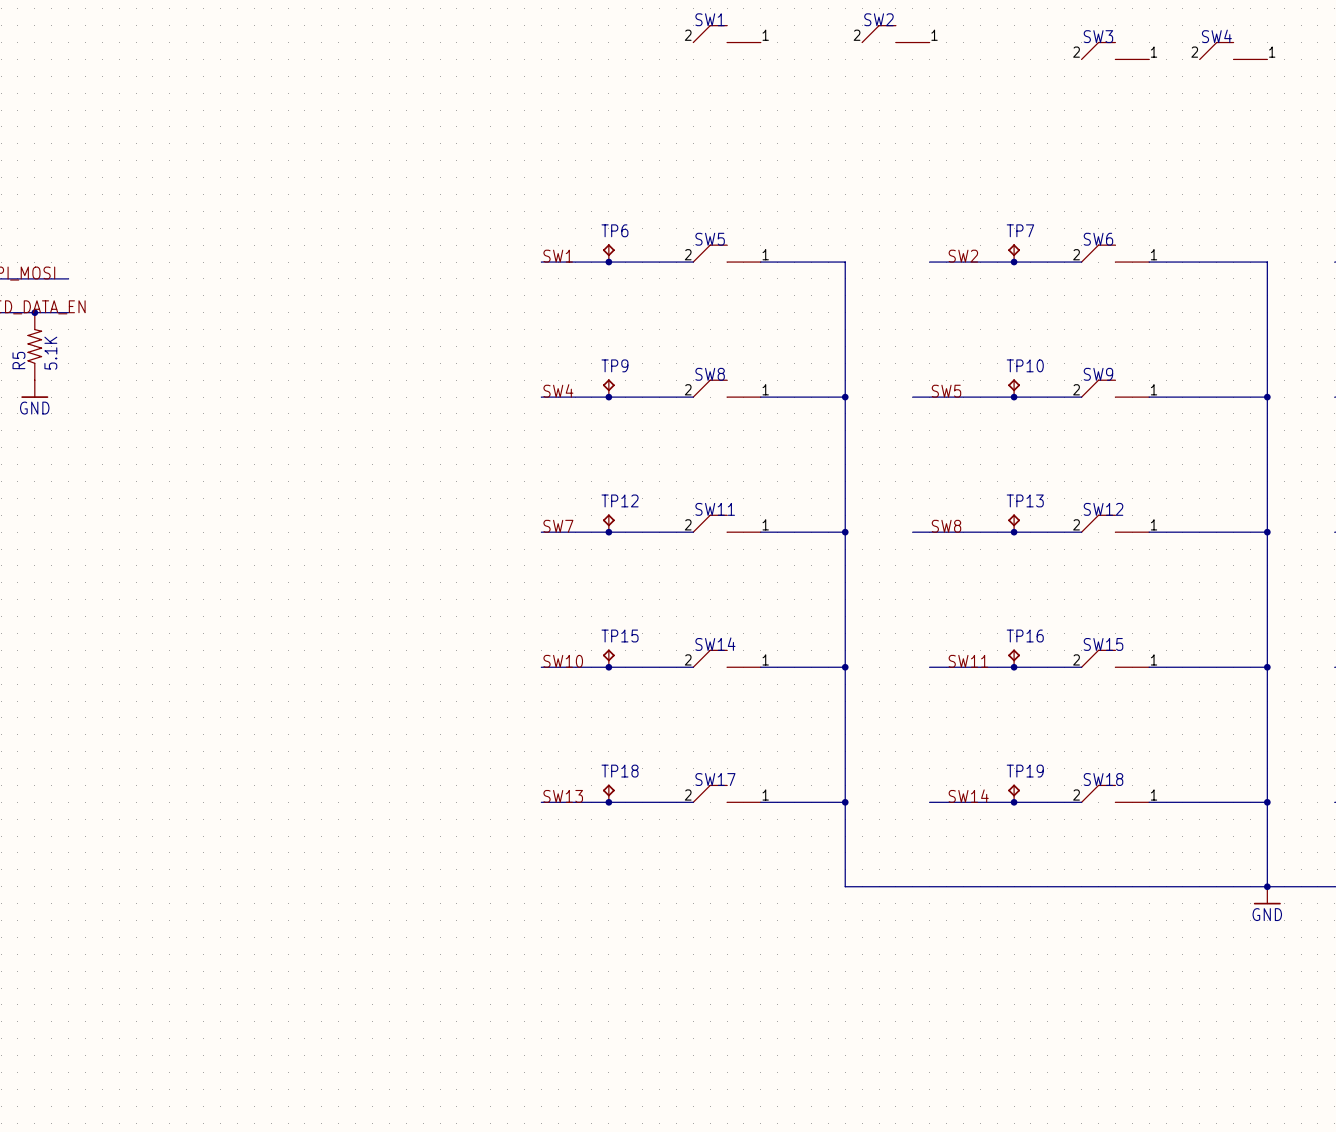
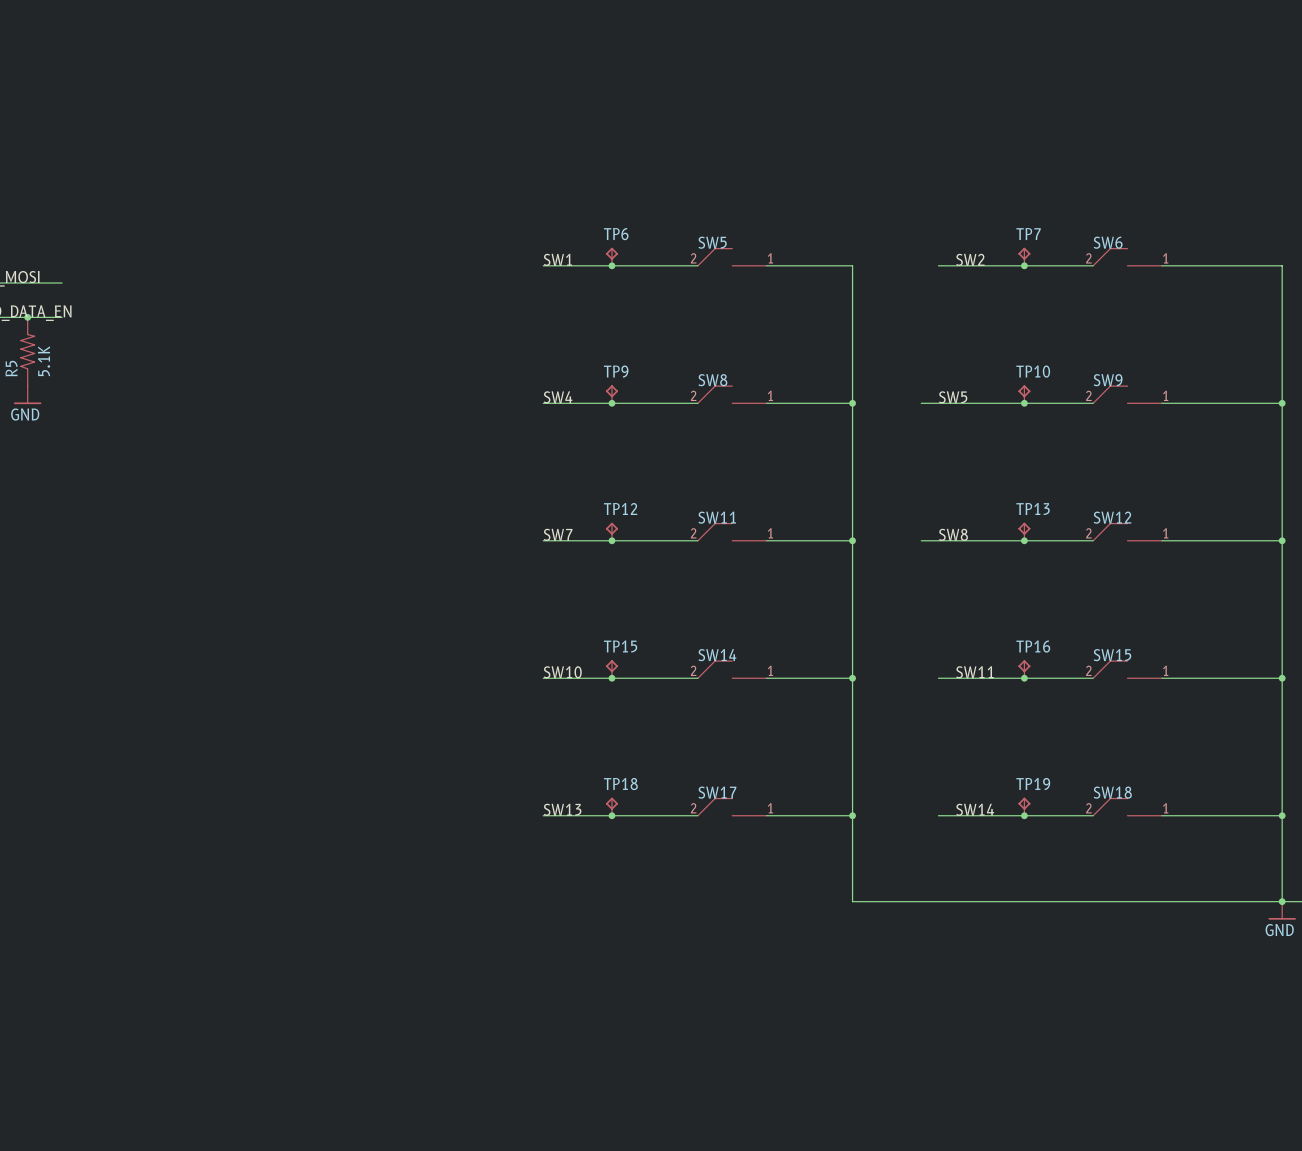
SW1: (727, 34) -> none
SW2: (895, 34) -> none
SW3: (1115, 50) -> none
SW4: (1233, 50) -> none

